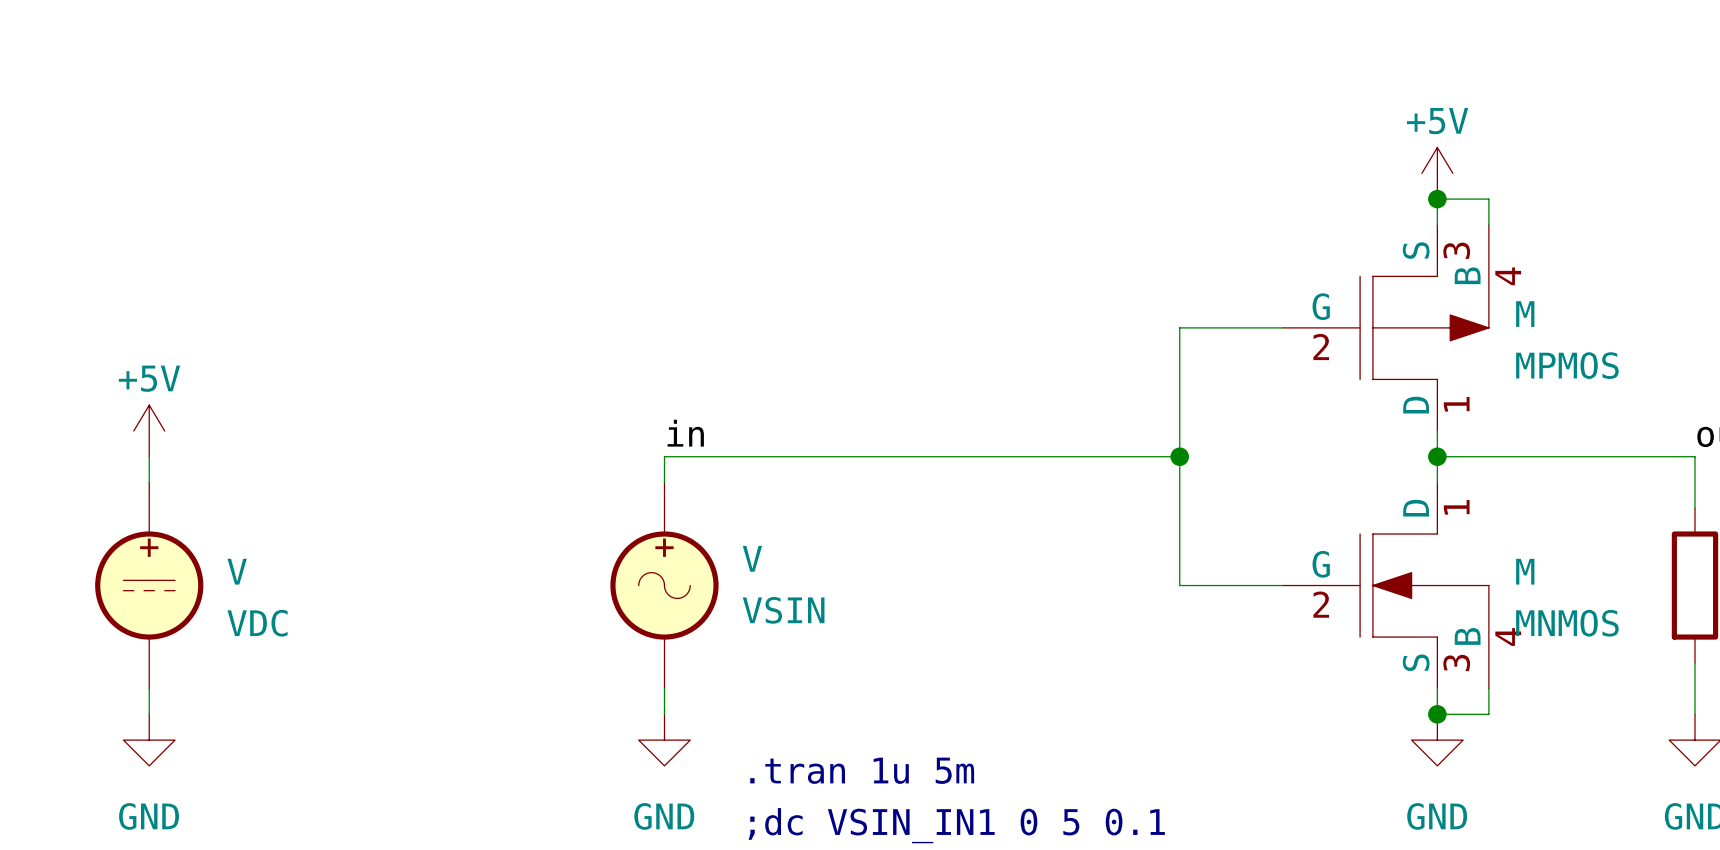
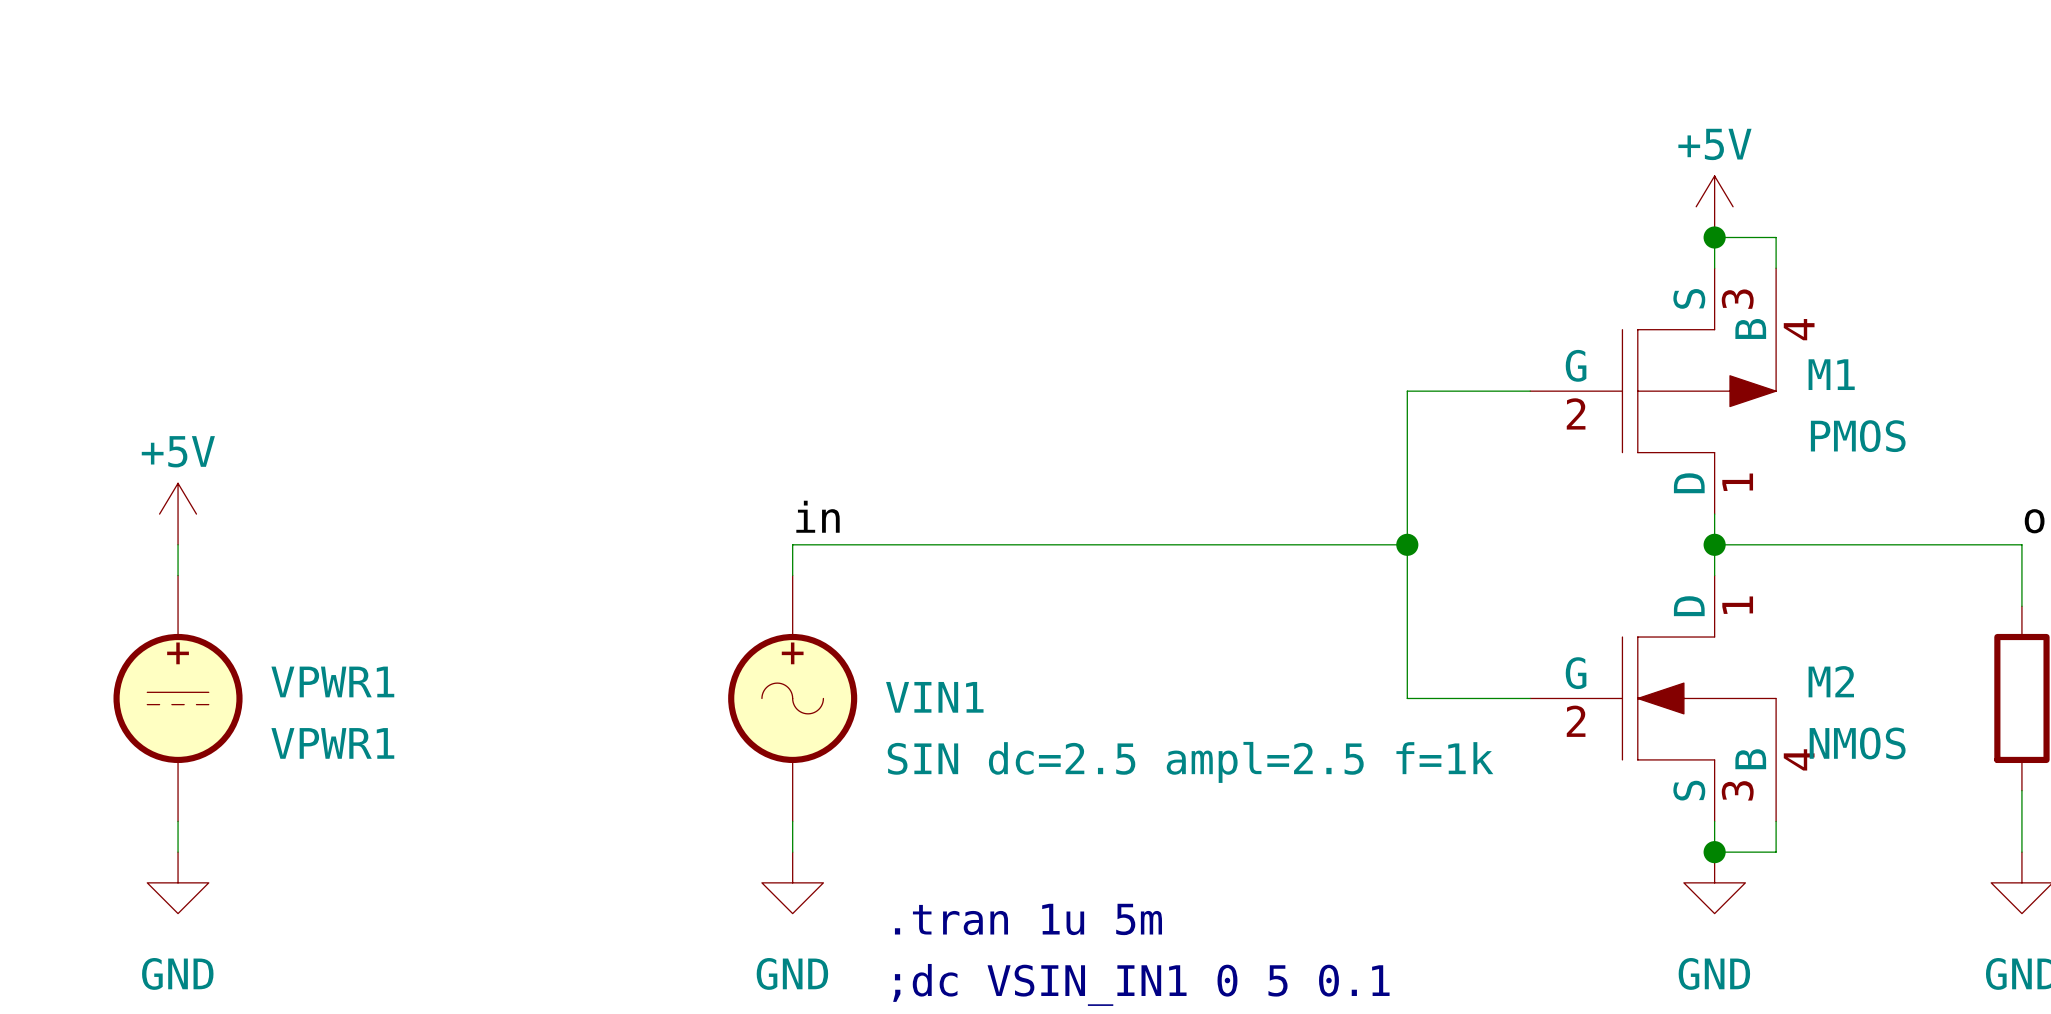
M name: M (1525, 314) -> M1 (1831, 374)
M value: MPMOS (1567, 365) -> PMOS (1858, 436)
V name: V (752, 558) -> VIN1 (934, 697)
V name: V (237, 571) -> VPWR1 (332, 681)
M name: M (1525, 571) -> M2 (1831, 681)
V value: VSIN (783, 610) -> SIN dc=2.5 ampl=2.5 f=1k (1190, 762)
V value: VDC (257, 623) -> VPWR1 (332, 743)
M value: MNMOS (1567, 623) -> NMOS (1857, 743)

